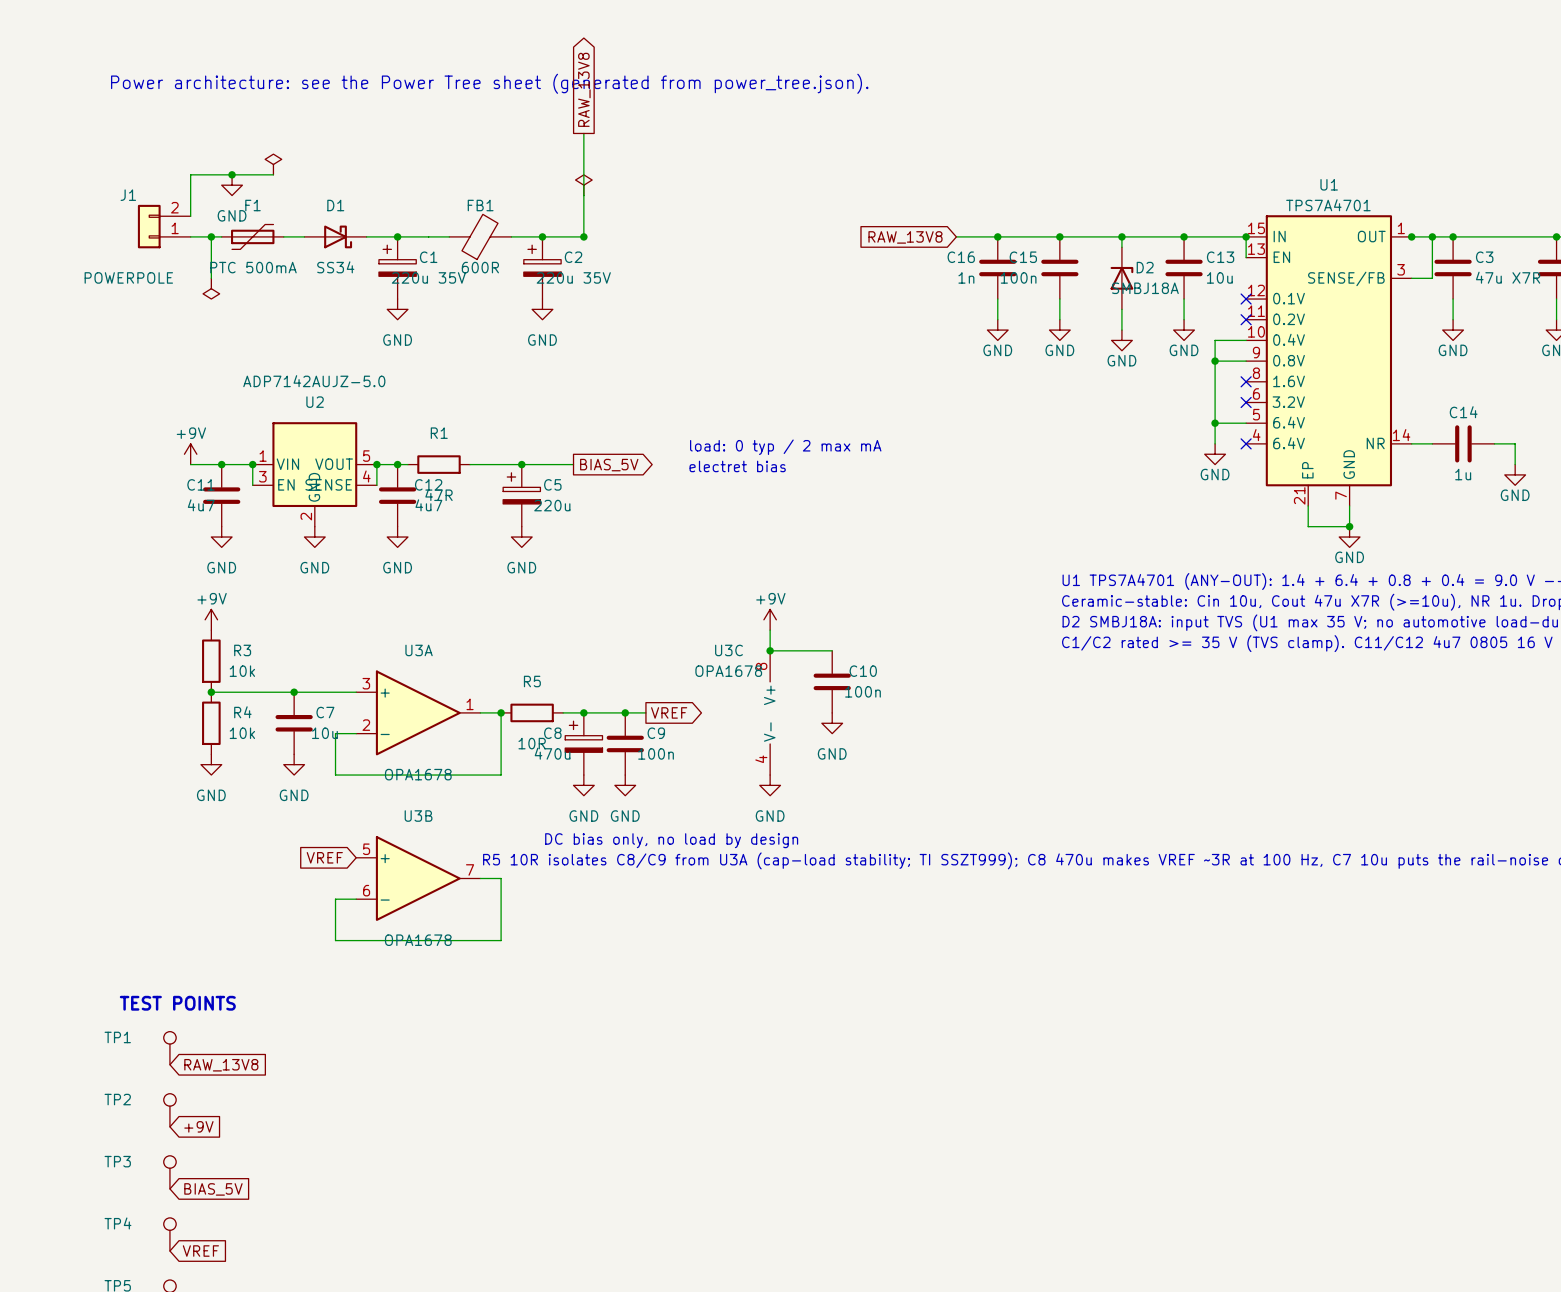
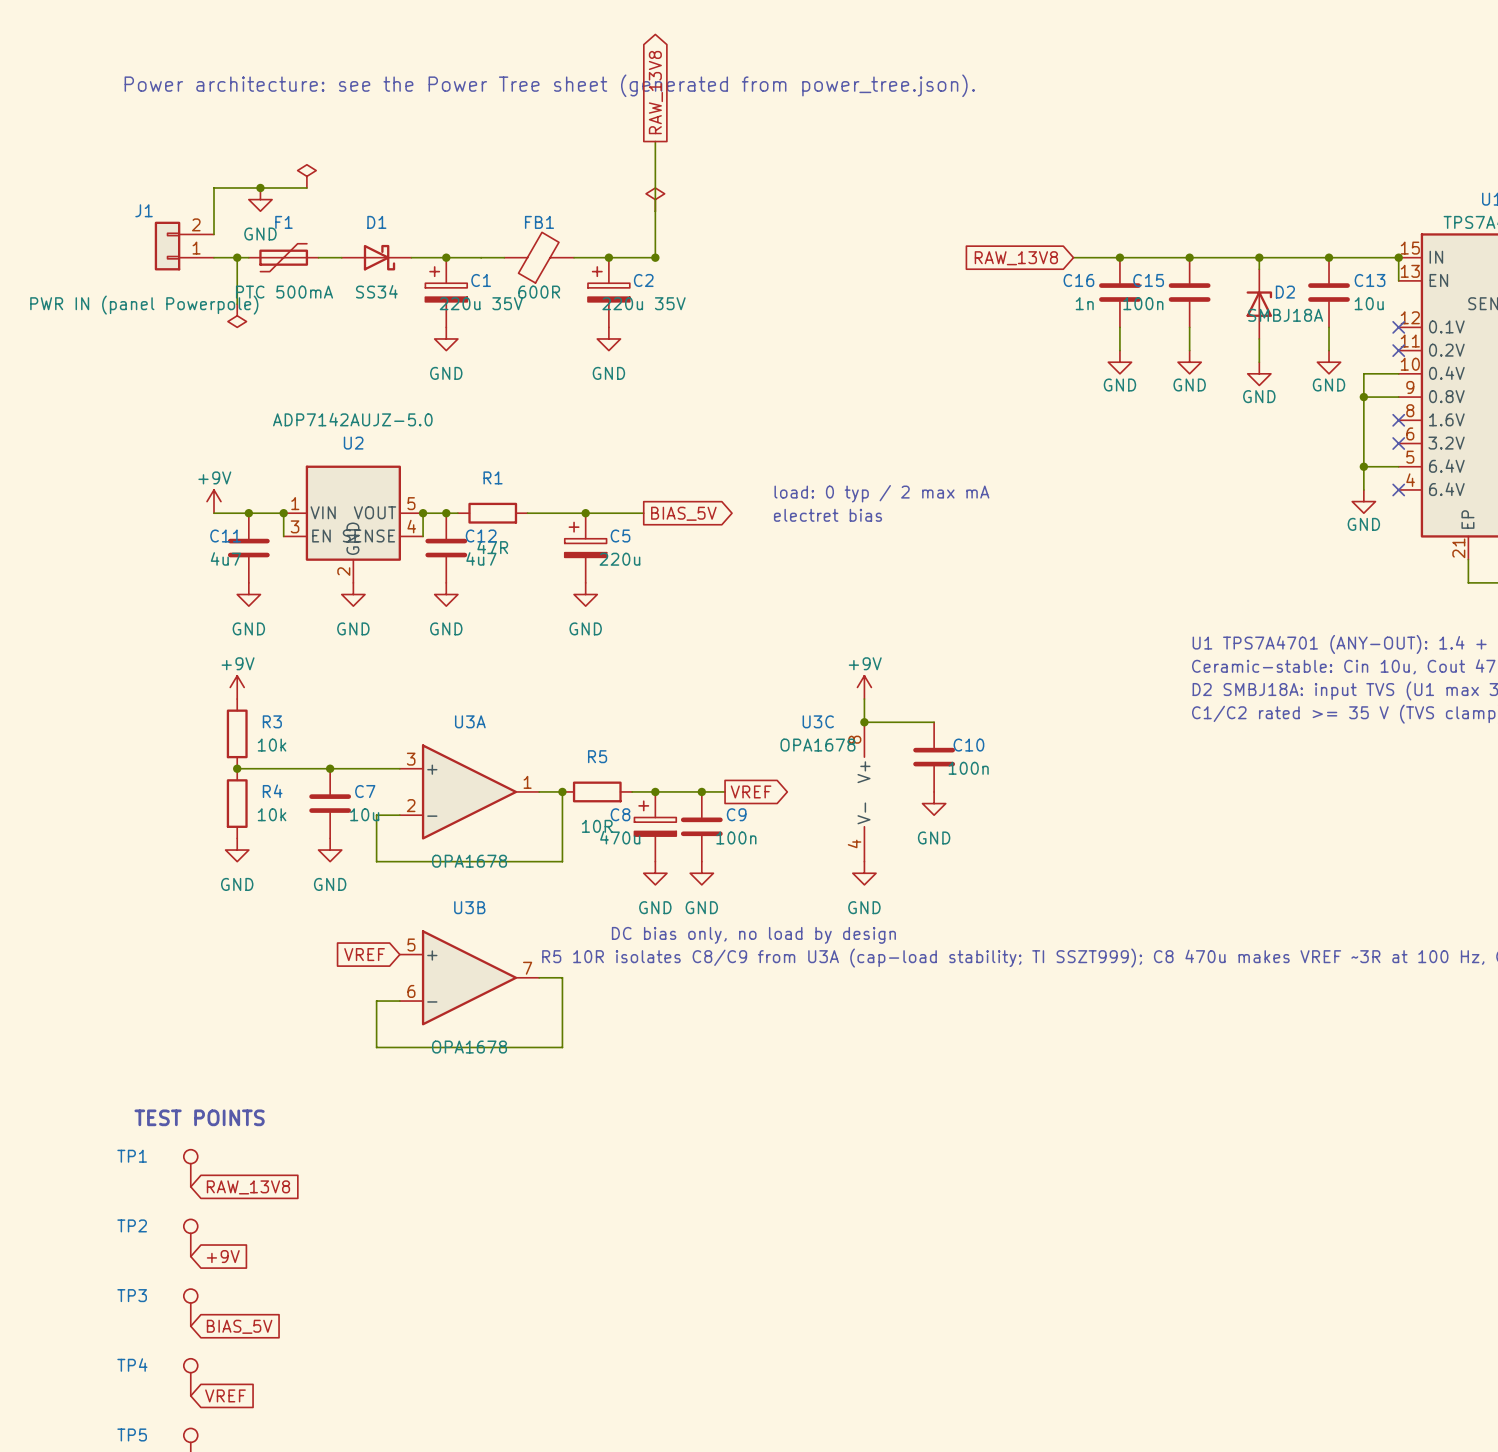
J1 value: POWERPOLE (128, 277) -> PWR IN (panel Powerpole) (144, 305)

